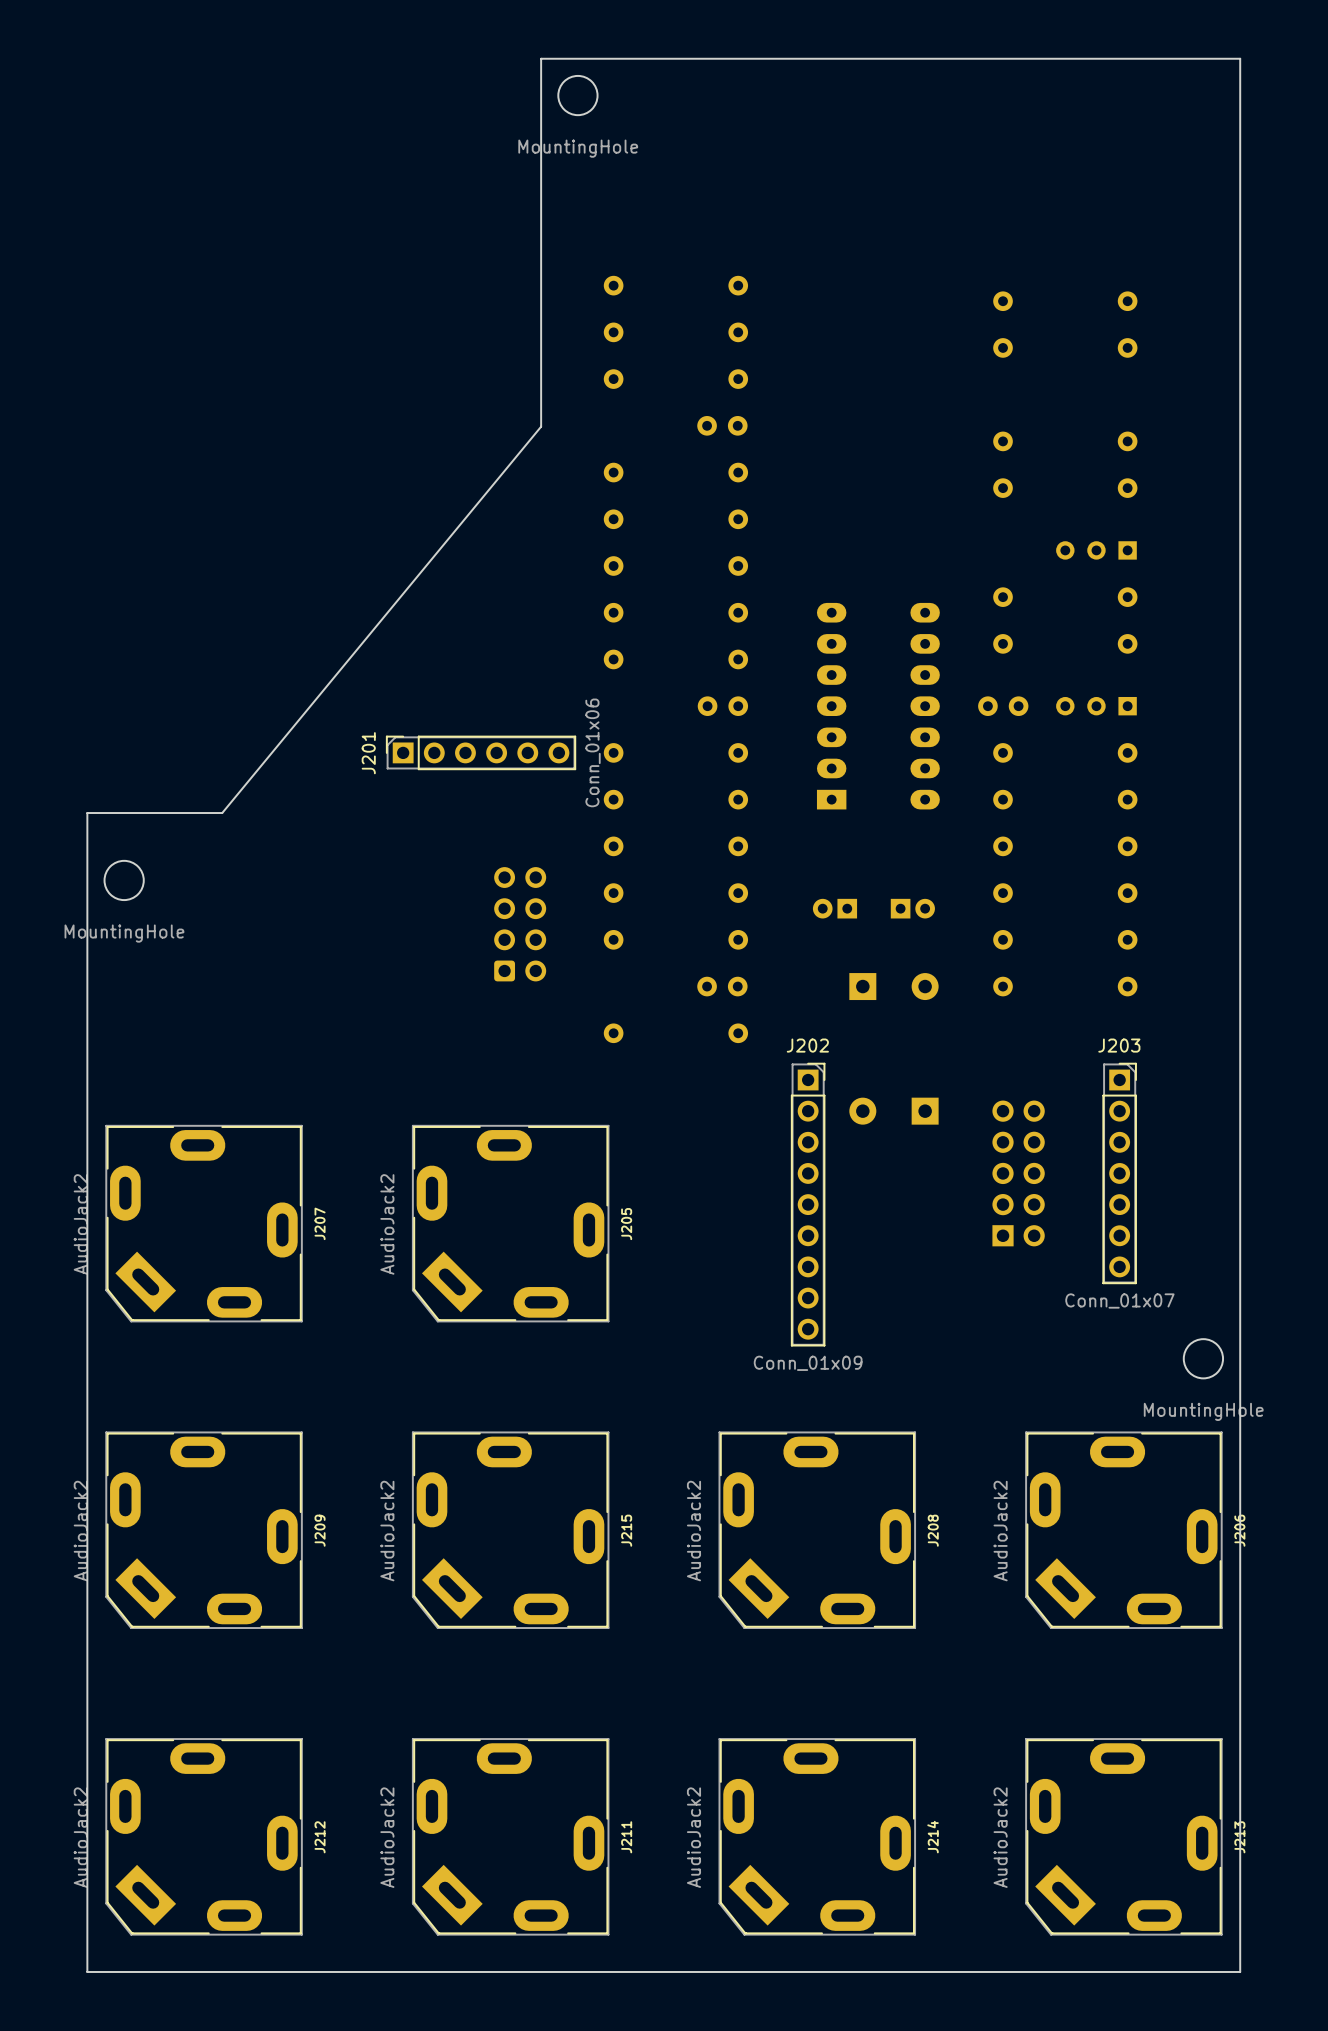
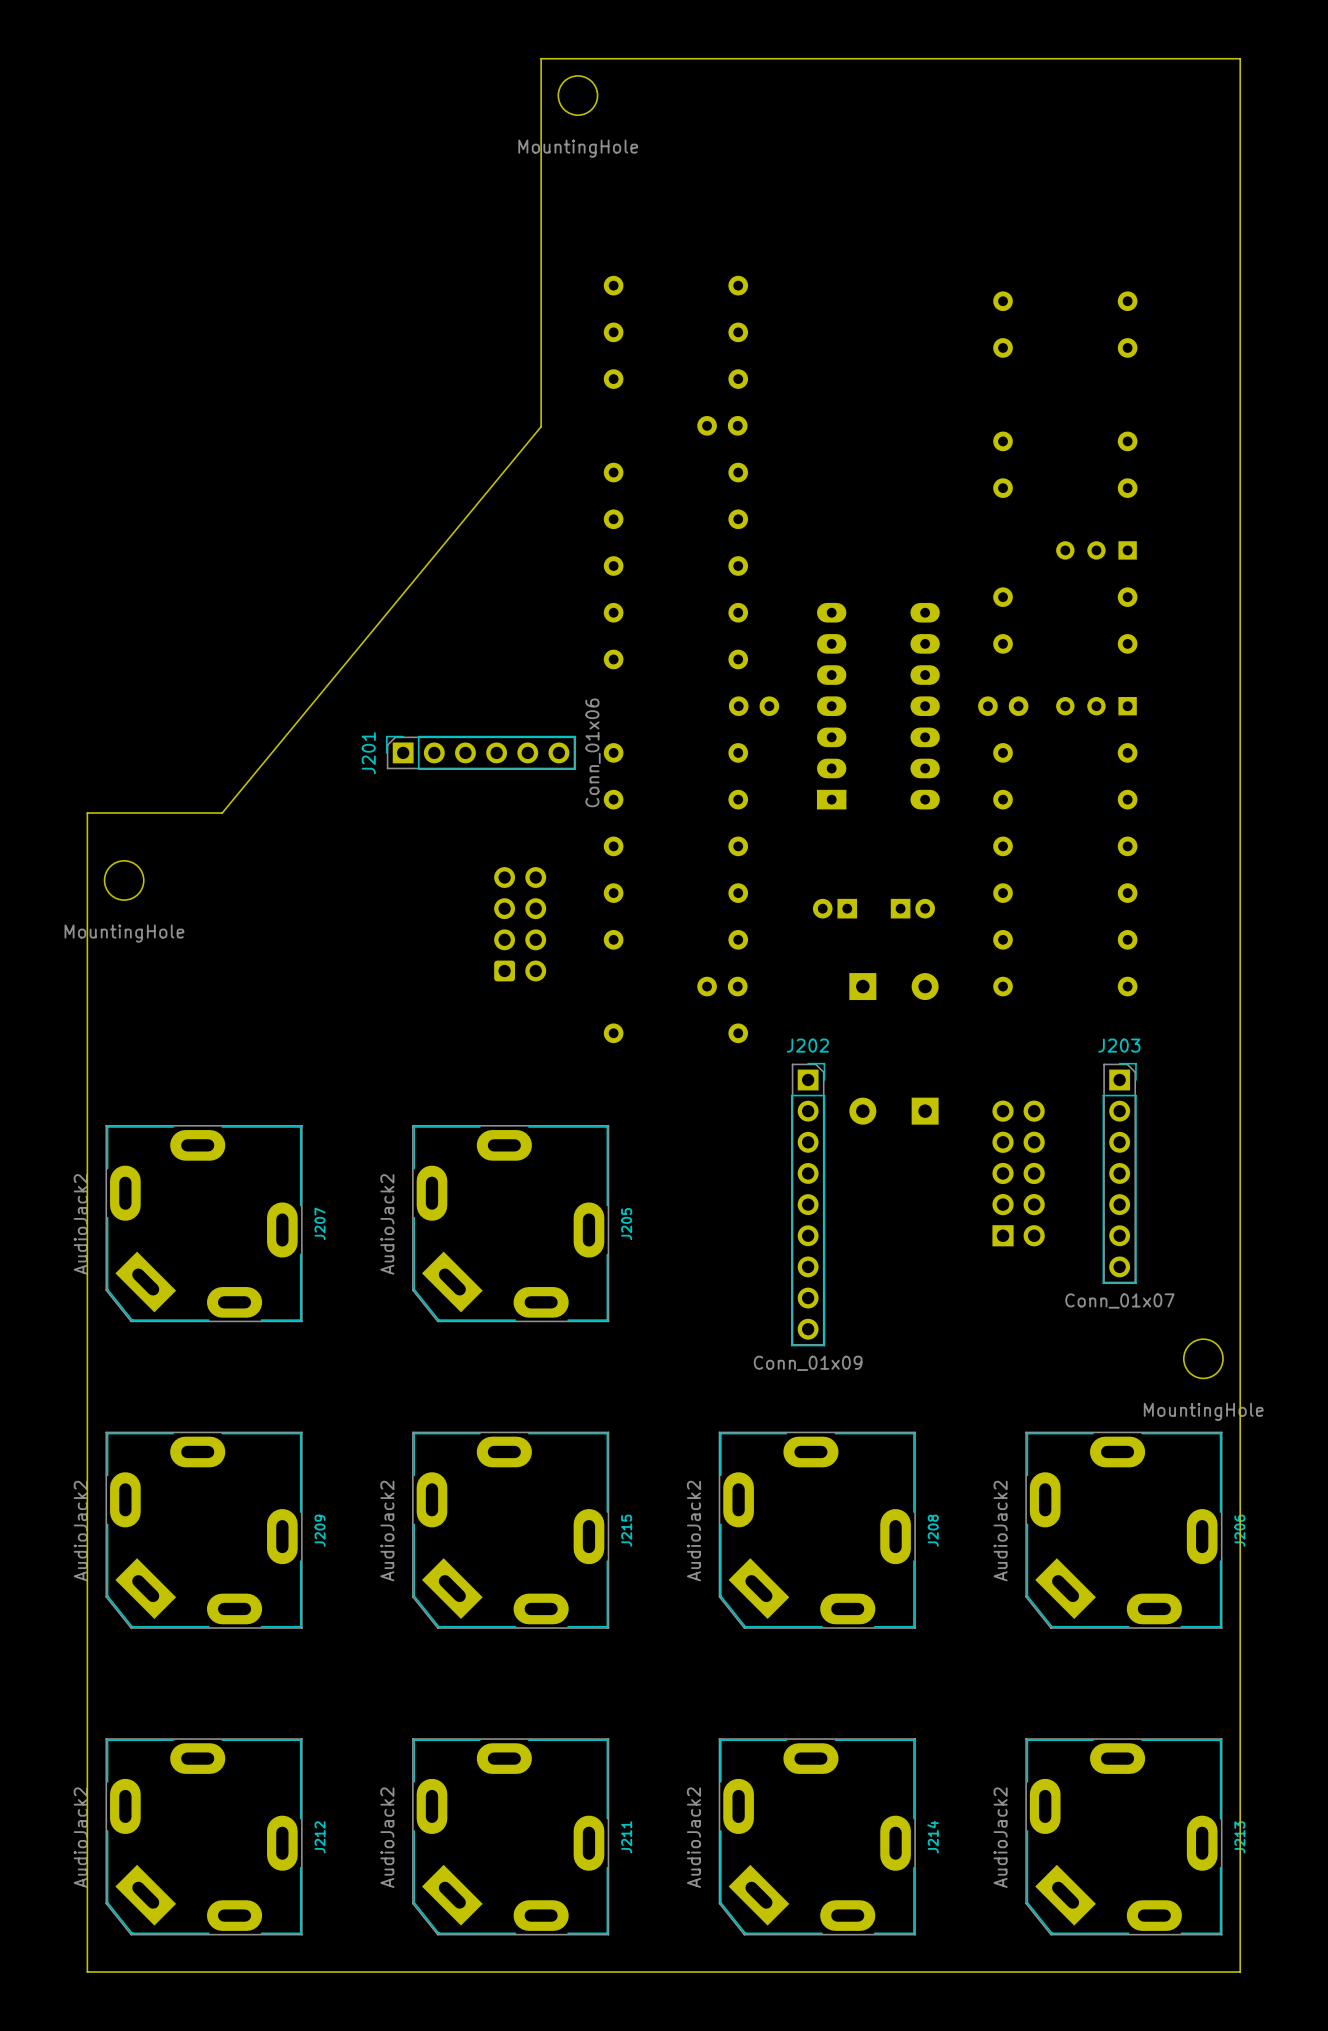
part position: (722, 706) -> (754, 706)

